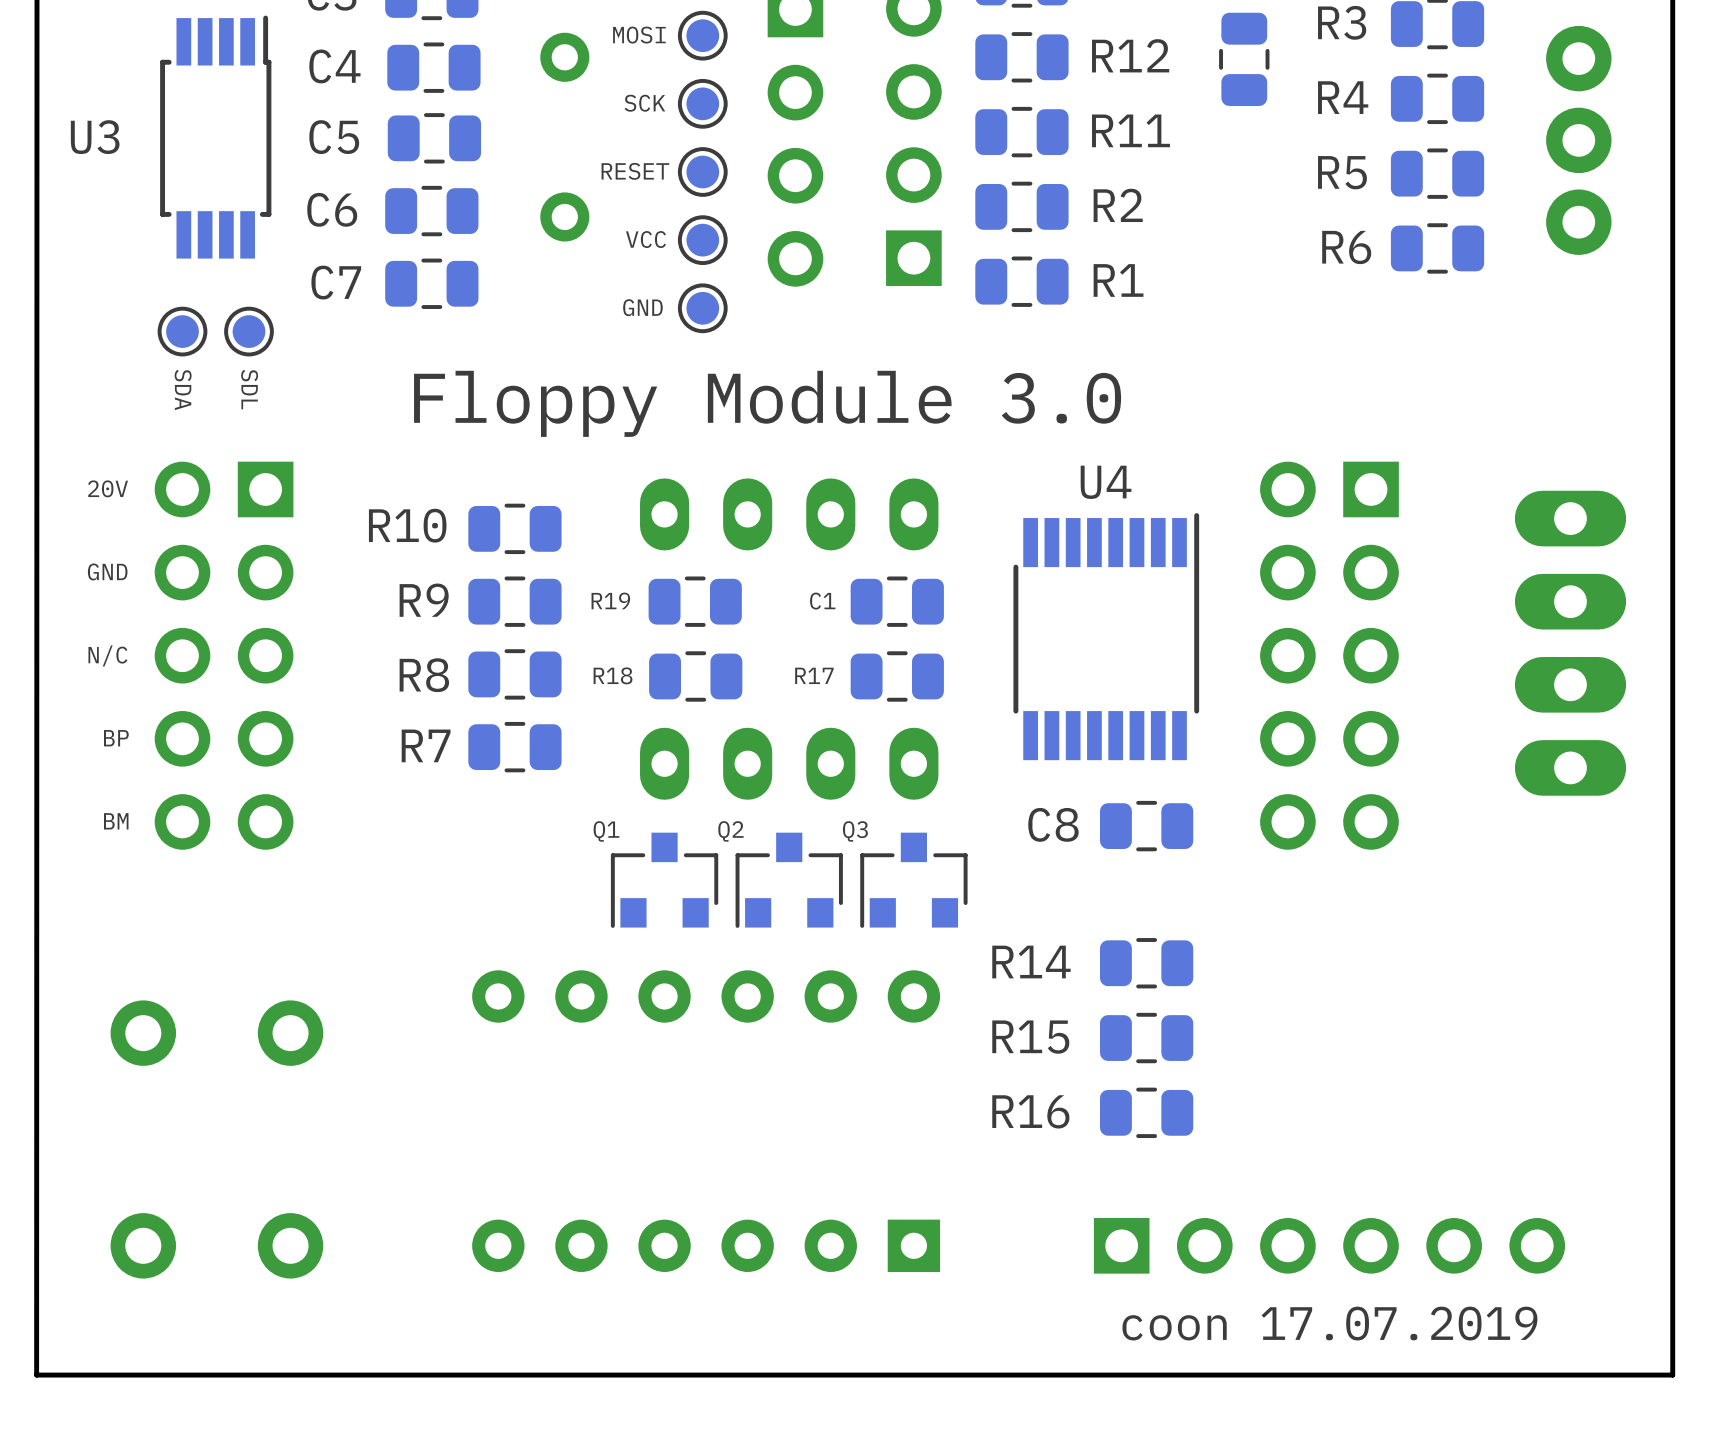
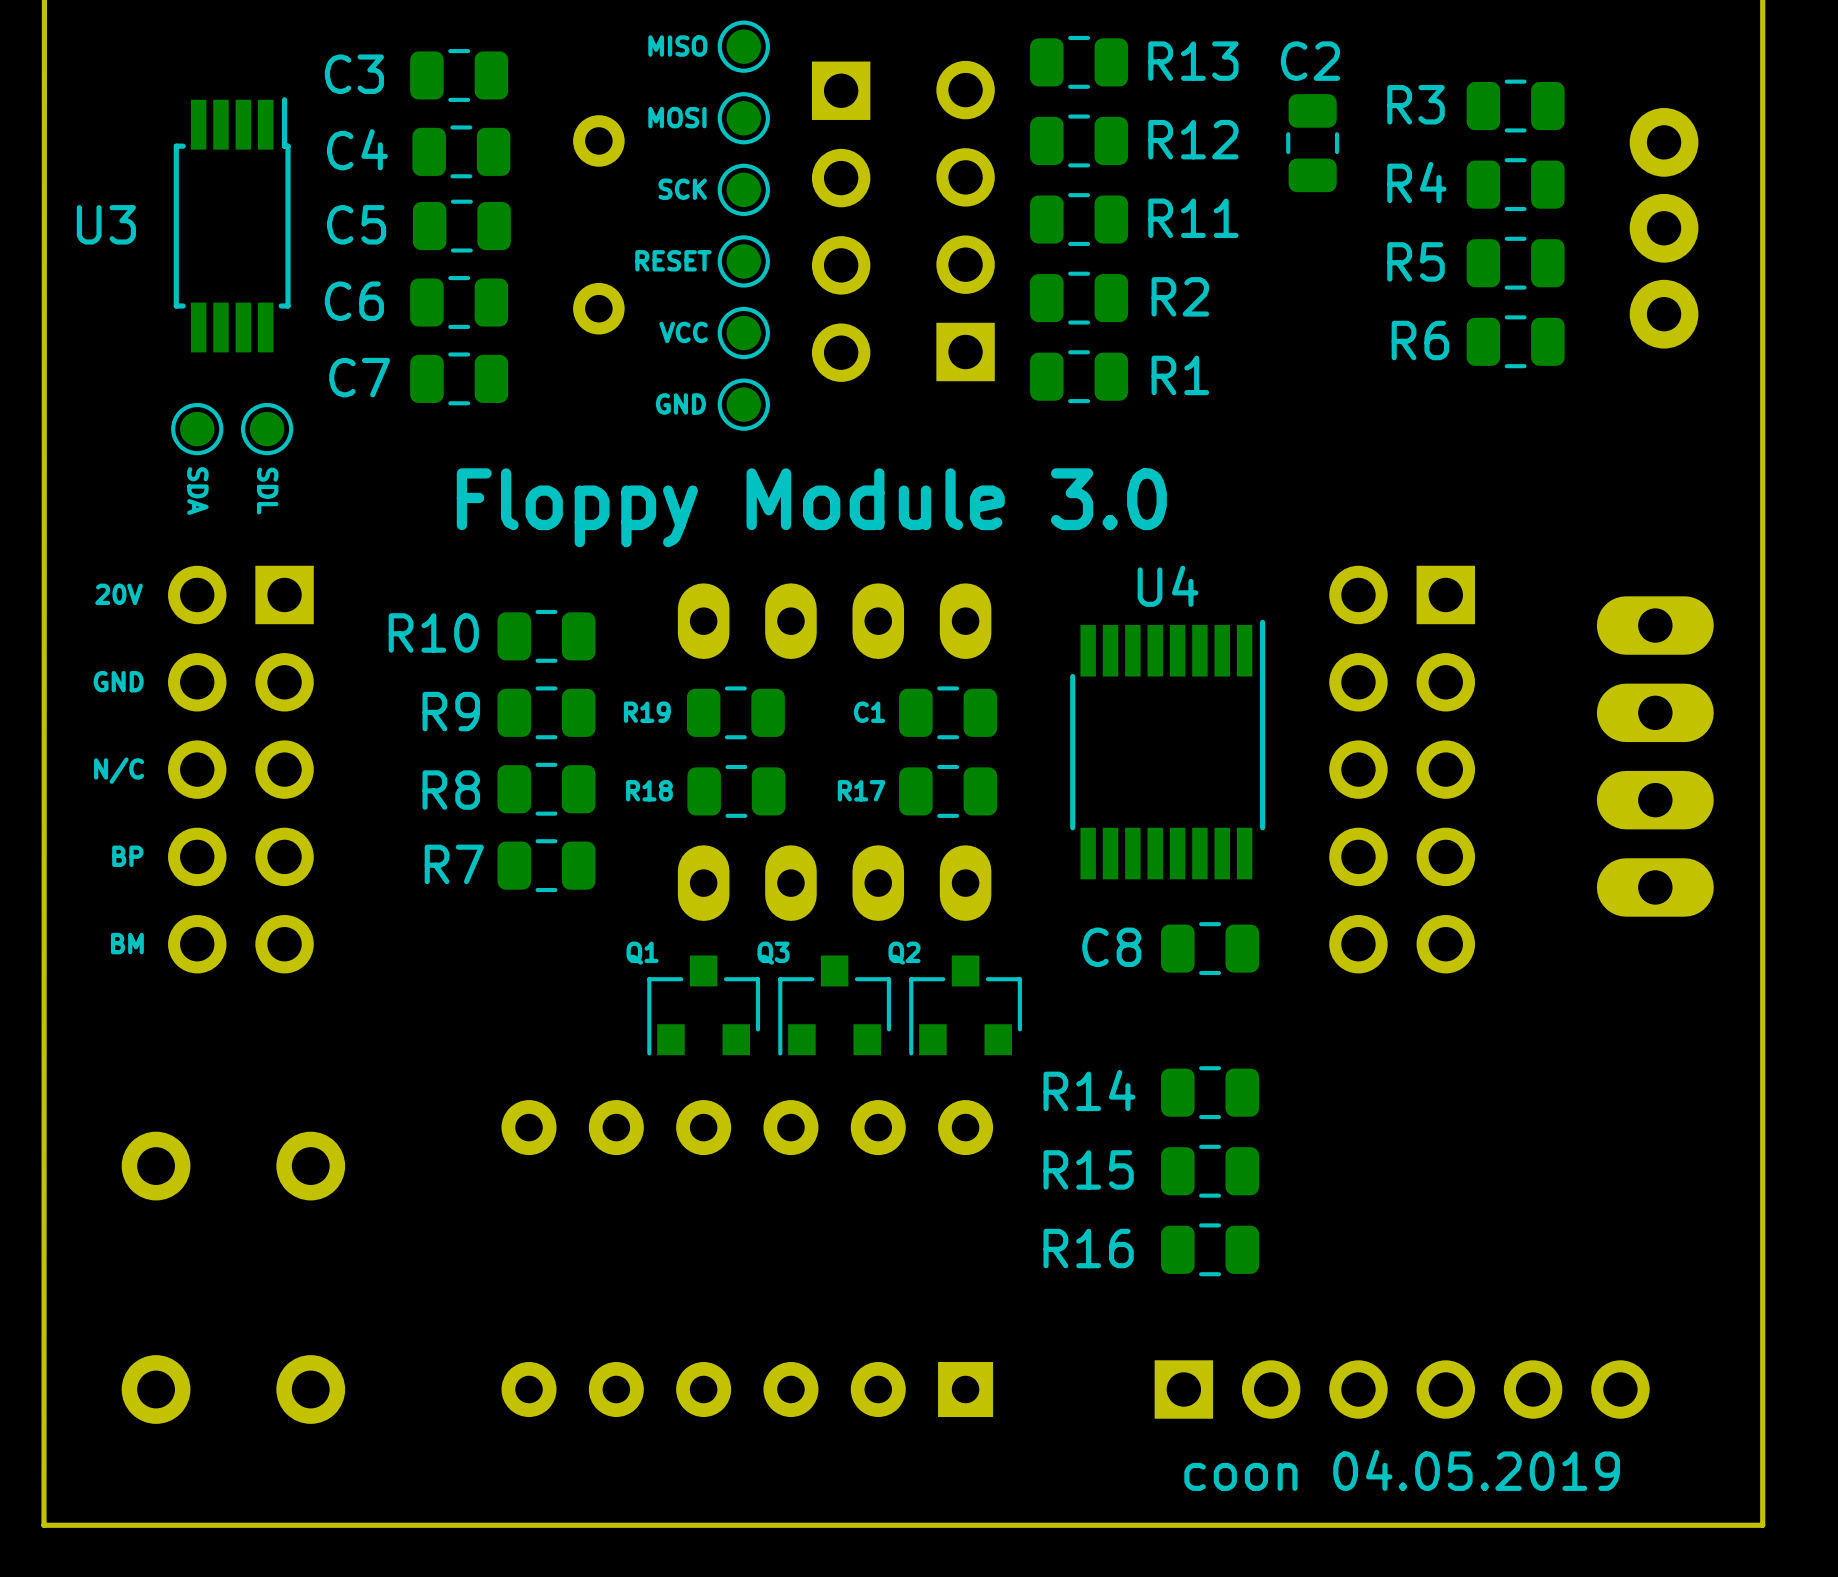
Q2 name: Q2 (730, 831) -> Q3 (773, 953)
Q3 name: Q3 (855, 831) -> Q2 (904, 953)
text: coon 17.07.2019 (1329, 1323) -> coon 04.05.2019 (1402, 1470)

